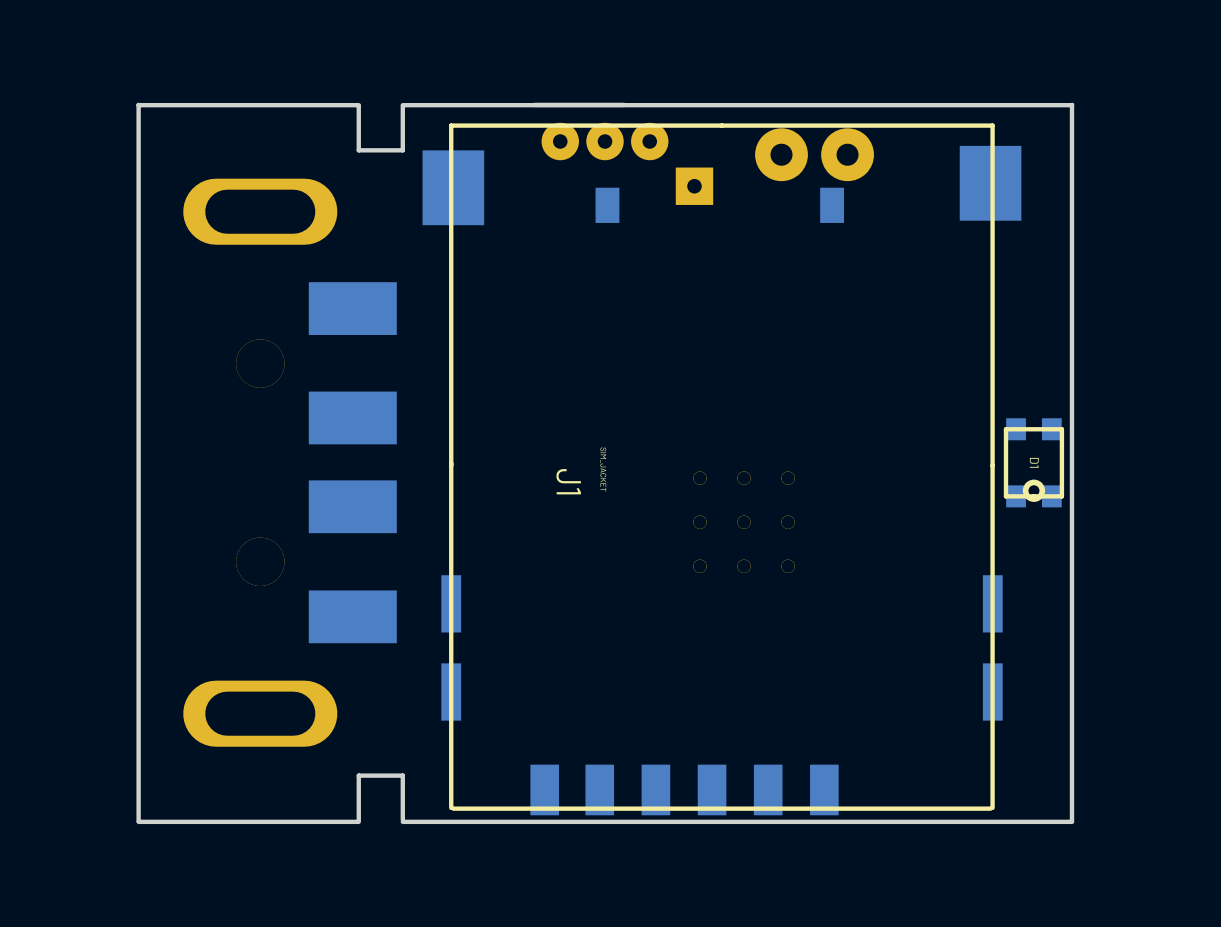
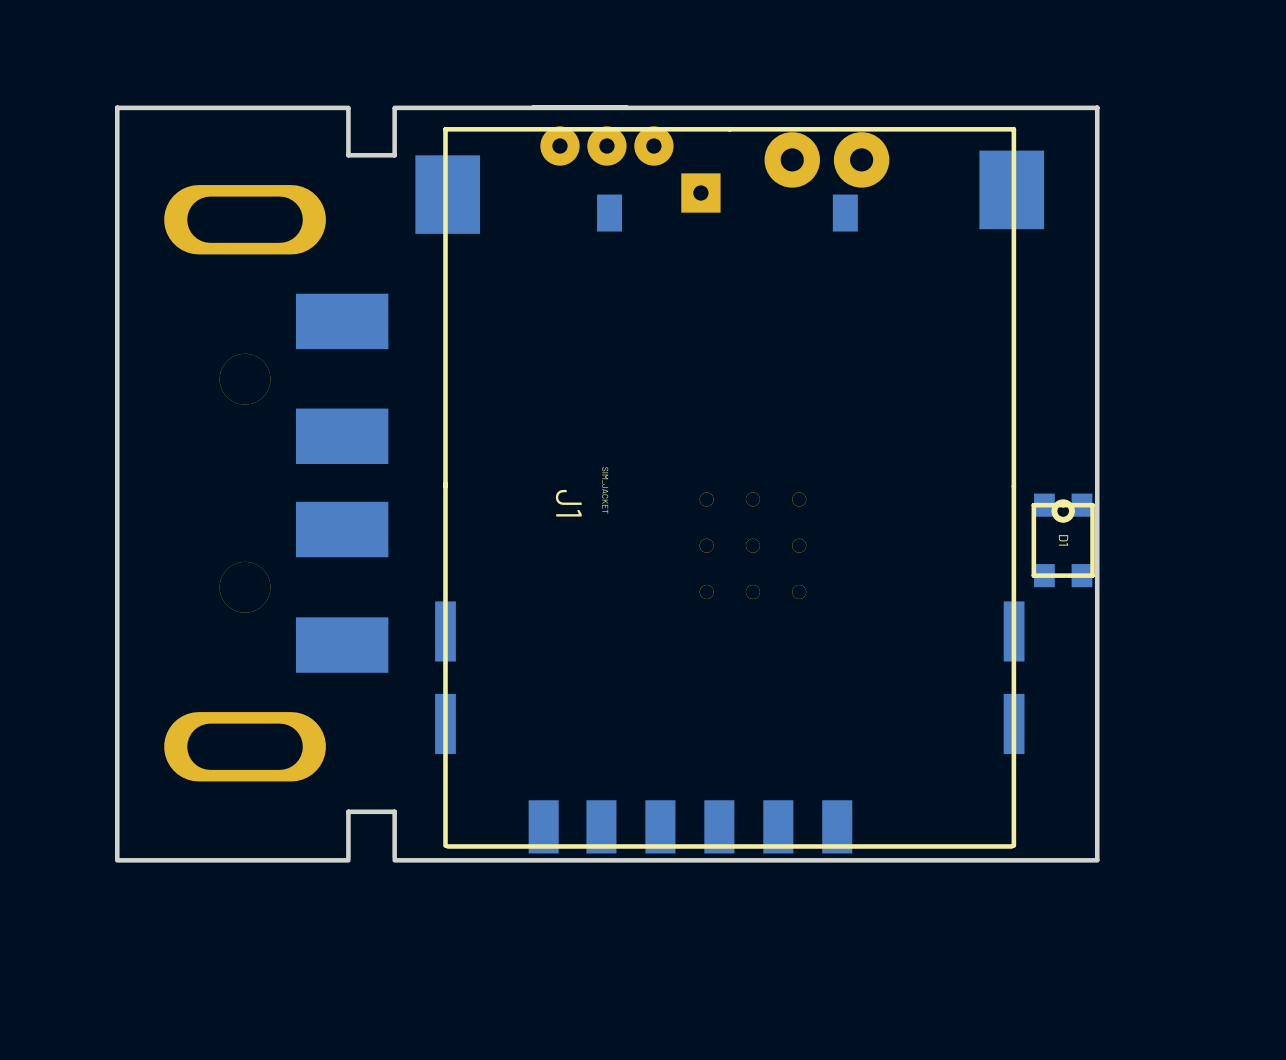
D1 rotation: 0° (1033, 462) -> 180° (1063, 540)
D1 position: (1033, 462) -> (1063, 540)

